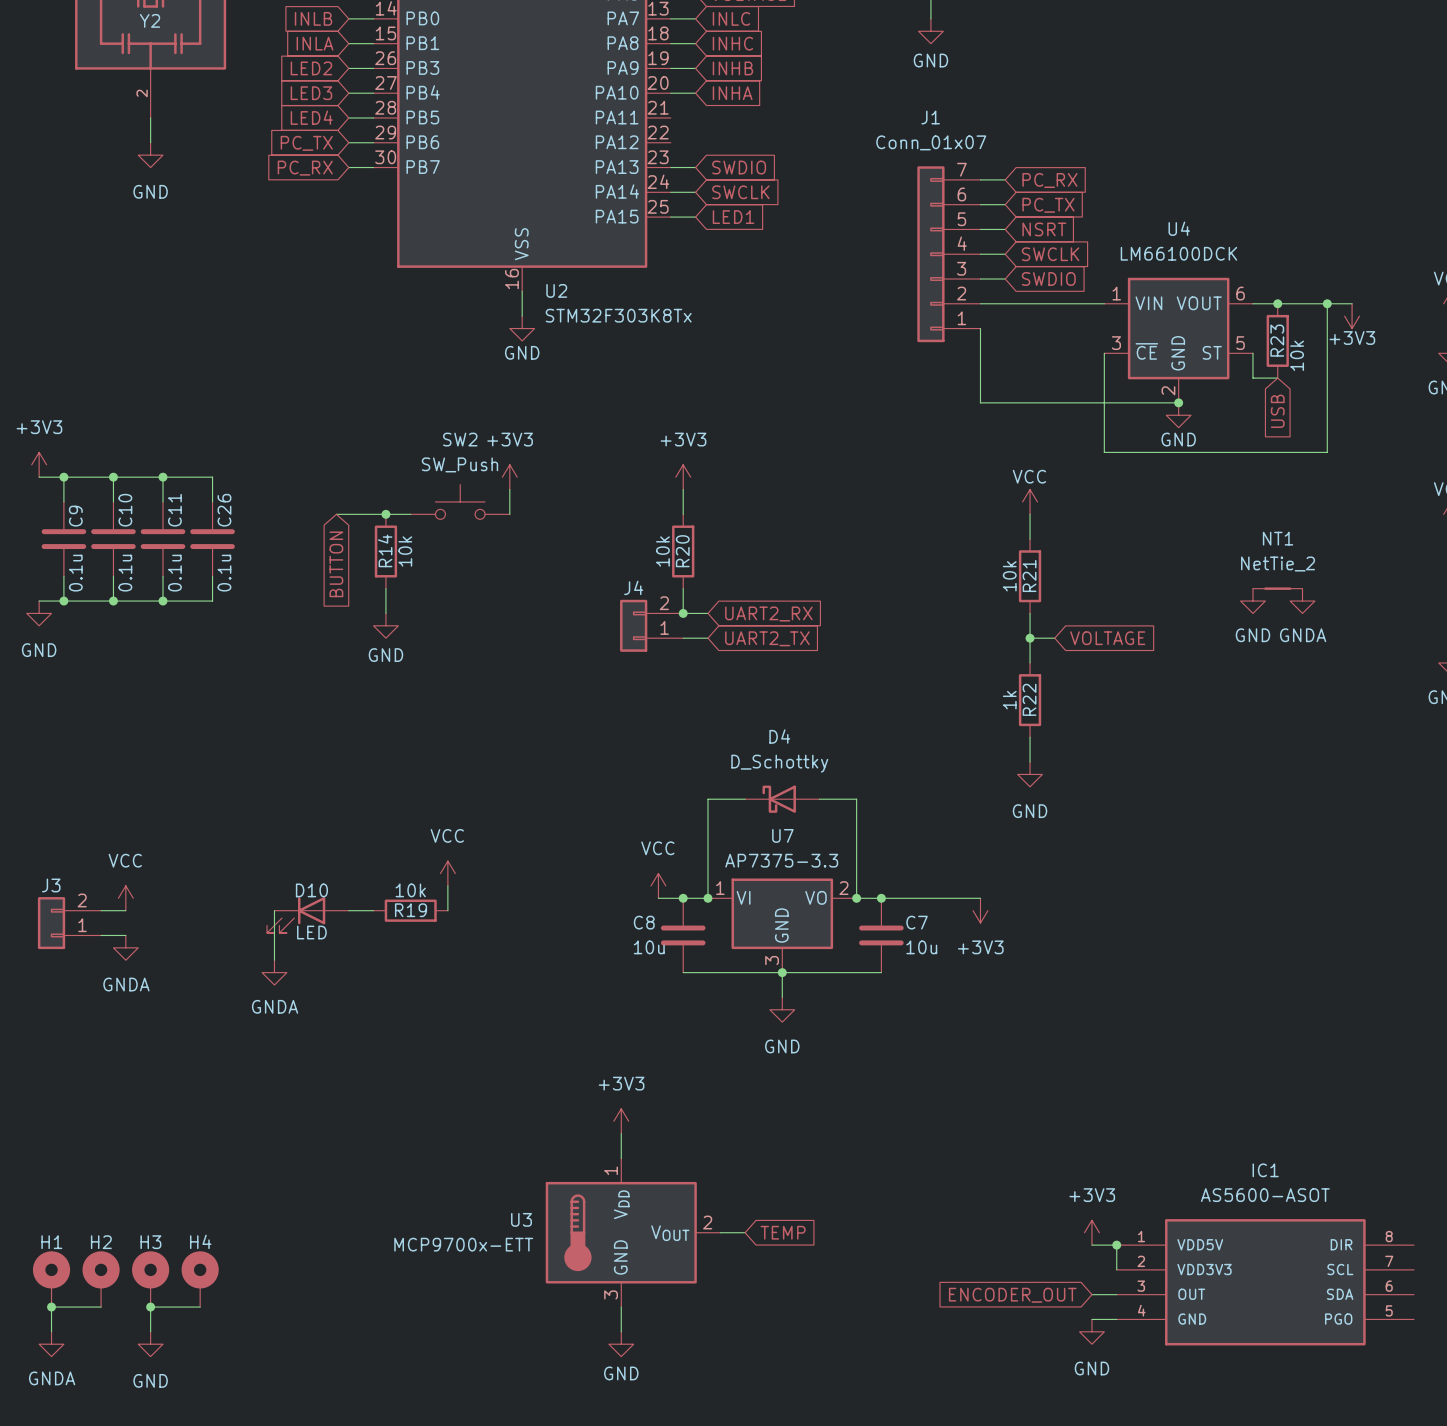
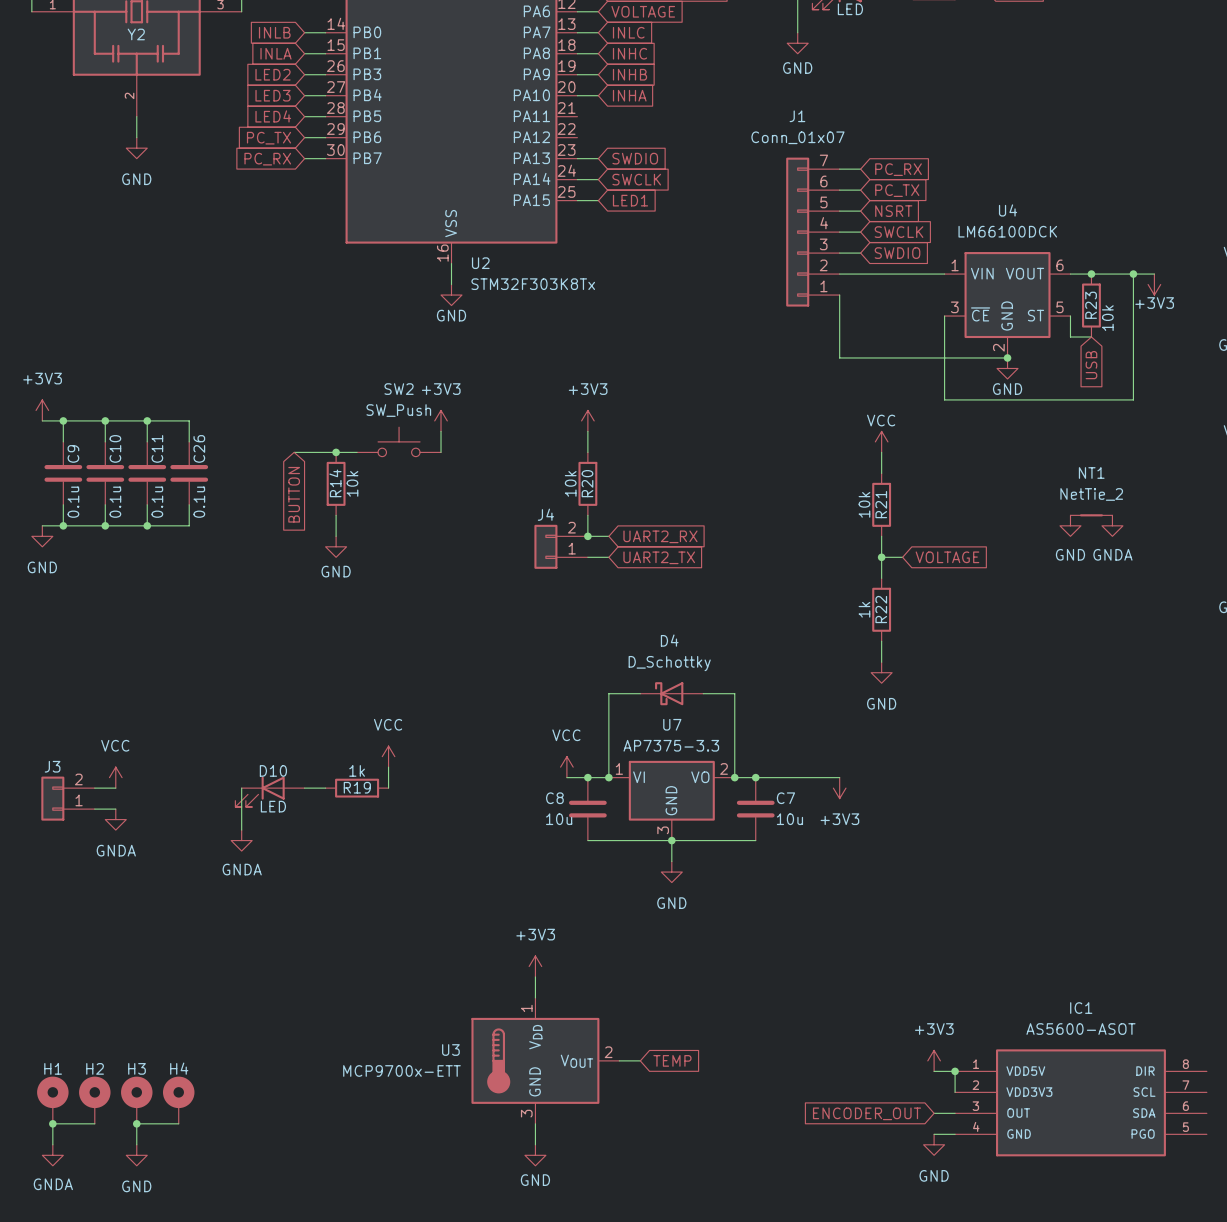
R19 value: 10k (410, 890) -> 1k (357, 770)

